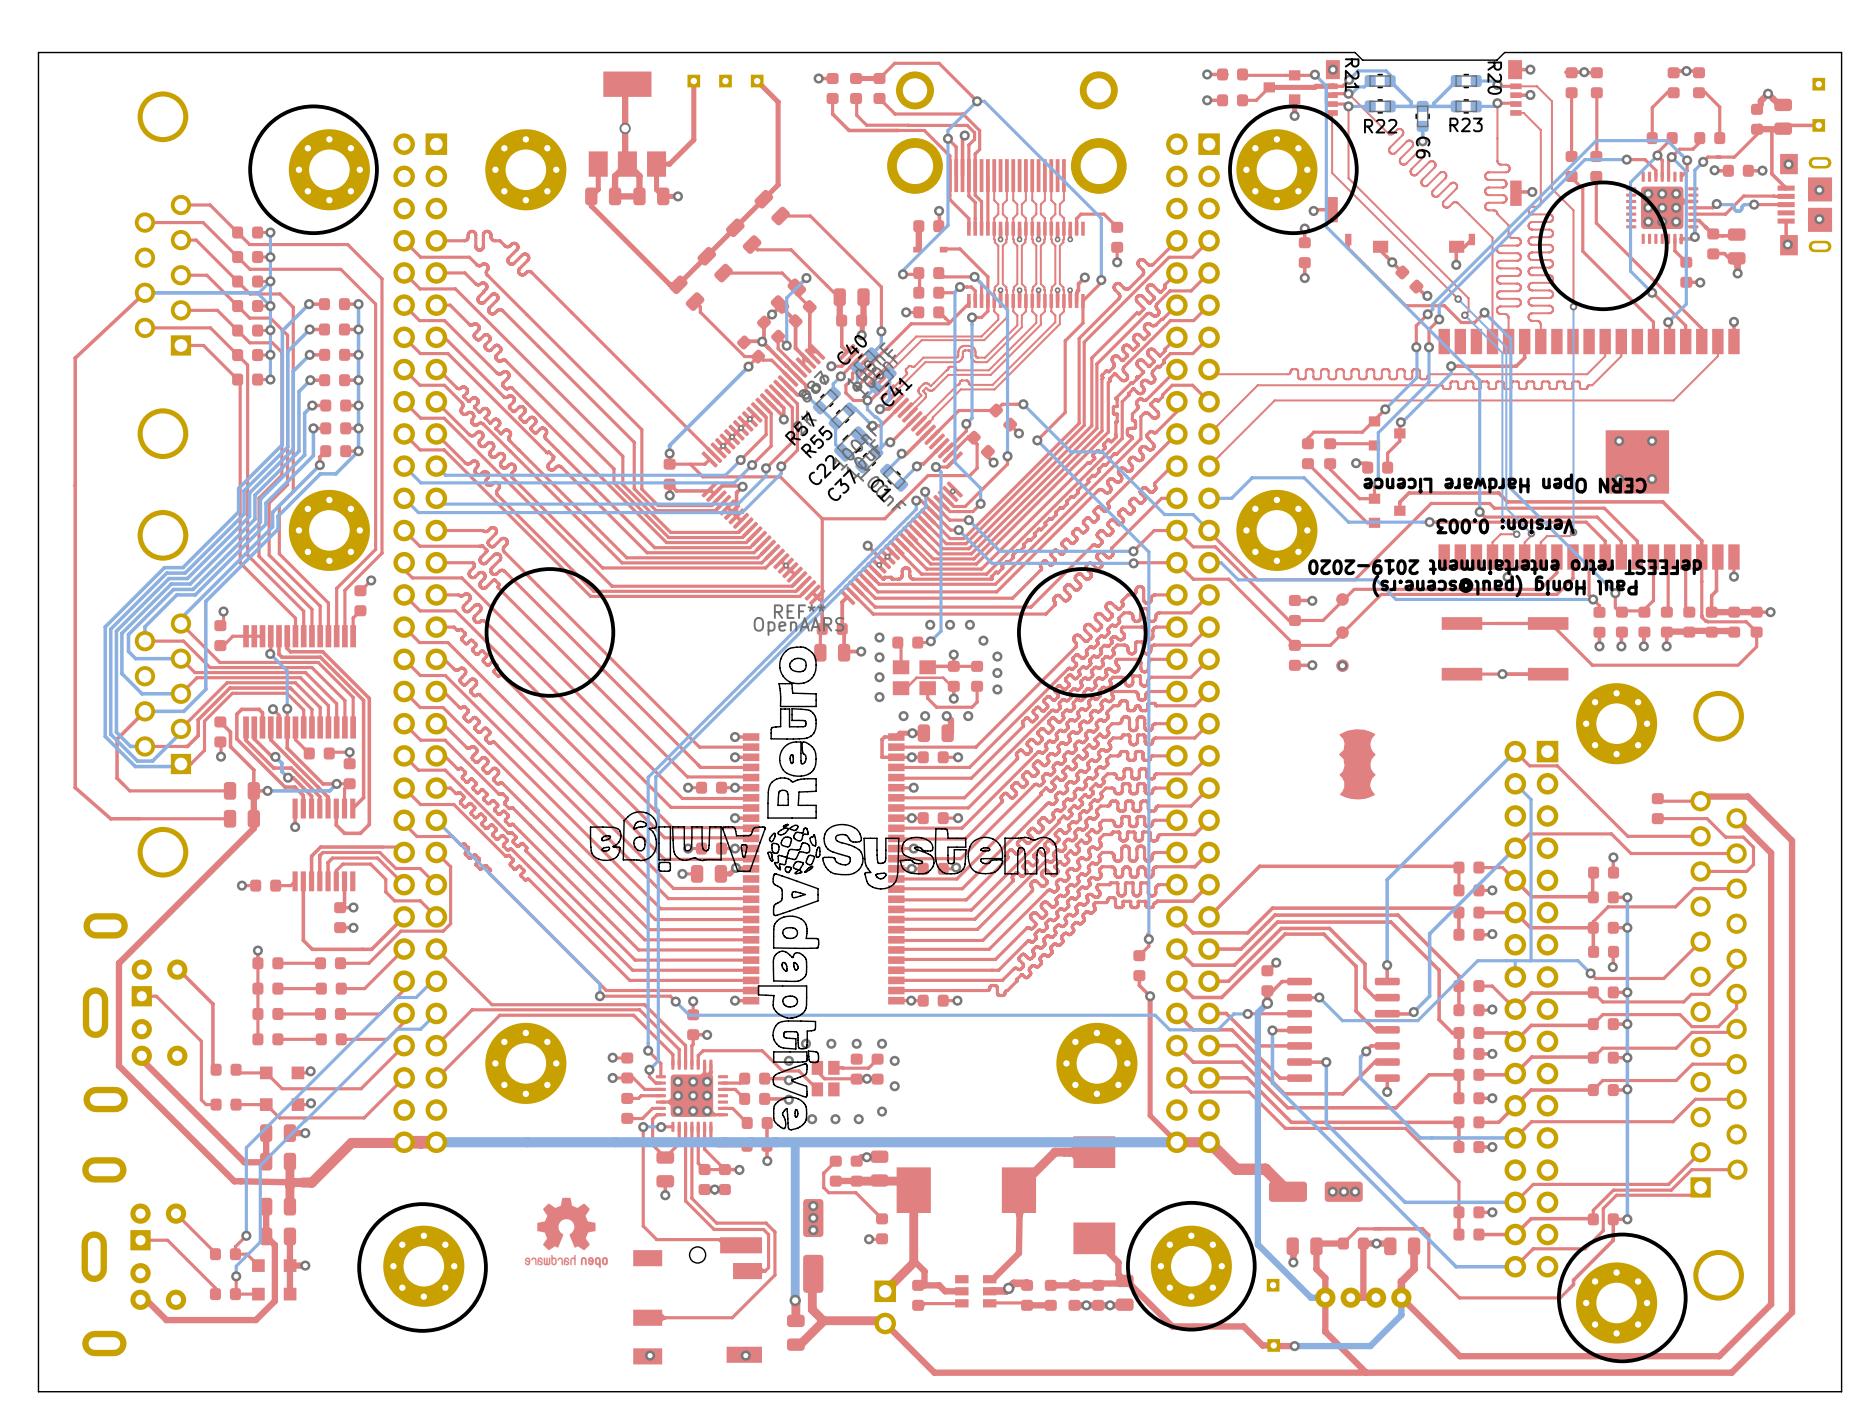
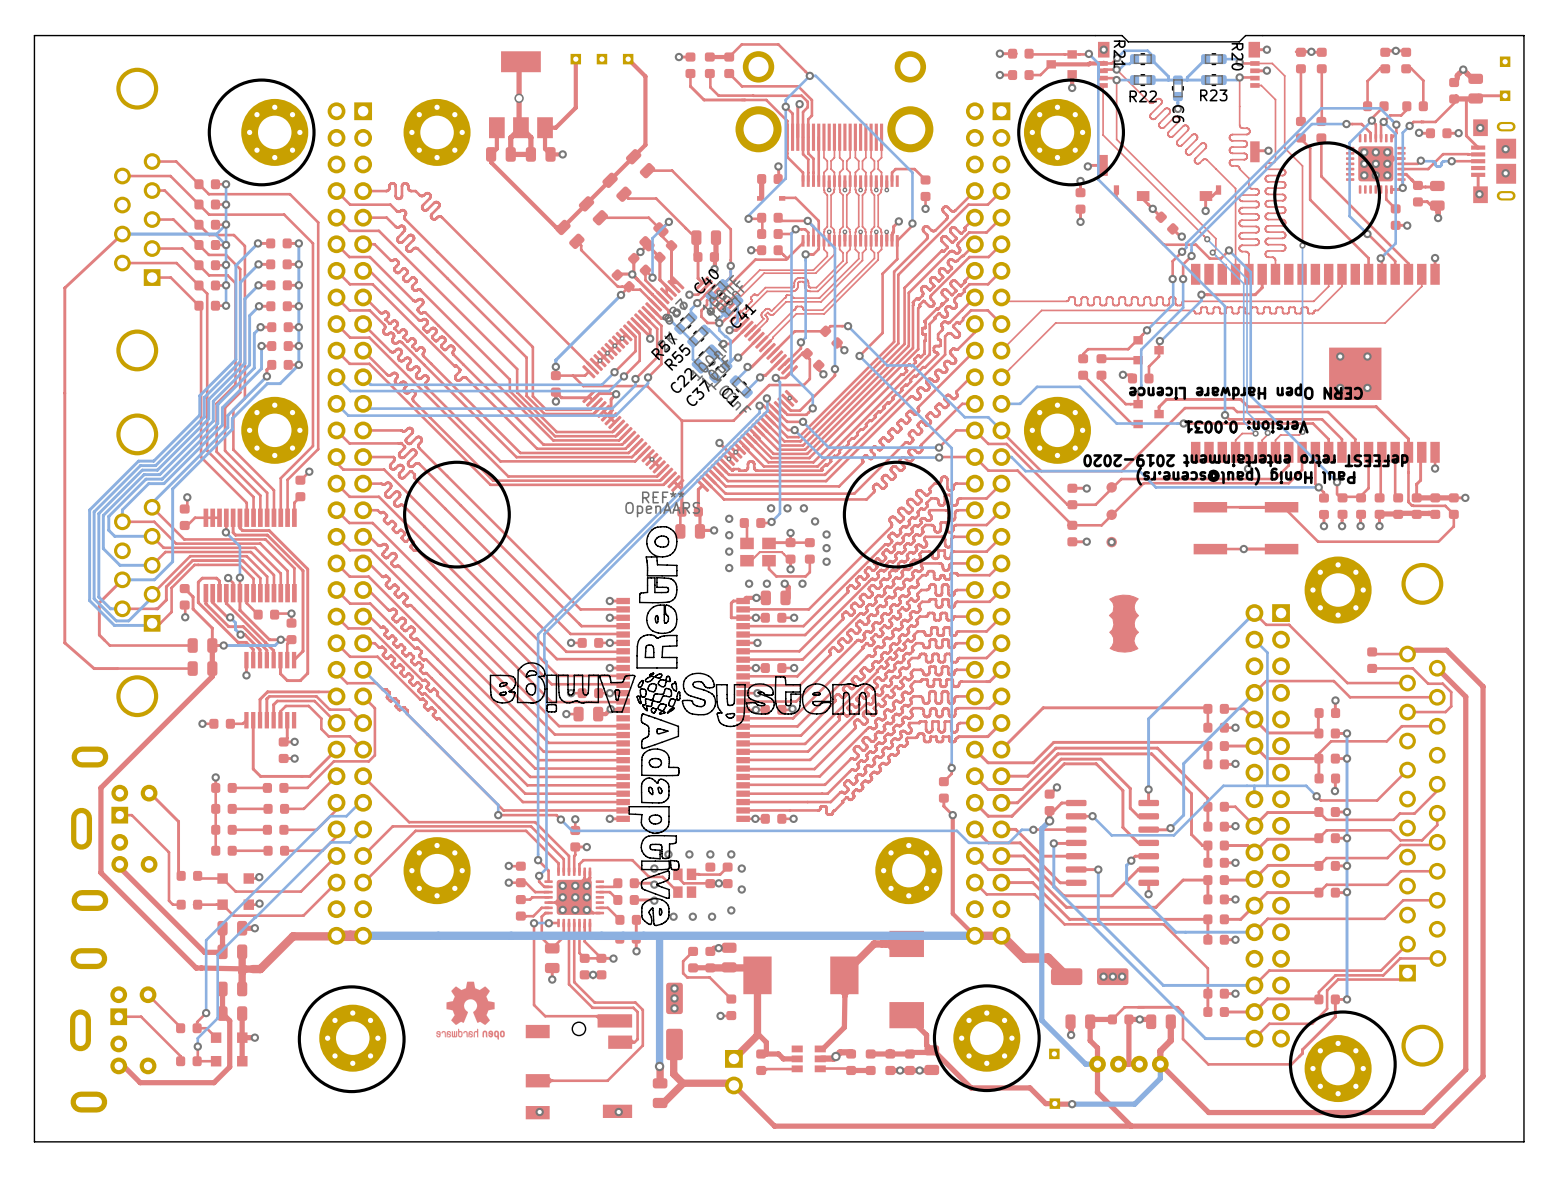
text: Version: 0.003 (1505, 526) -> Version: 0.0031 (1246, 427)

